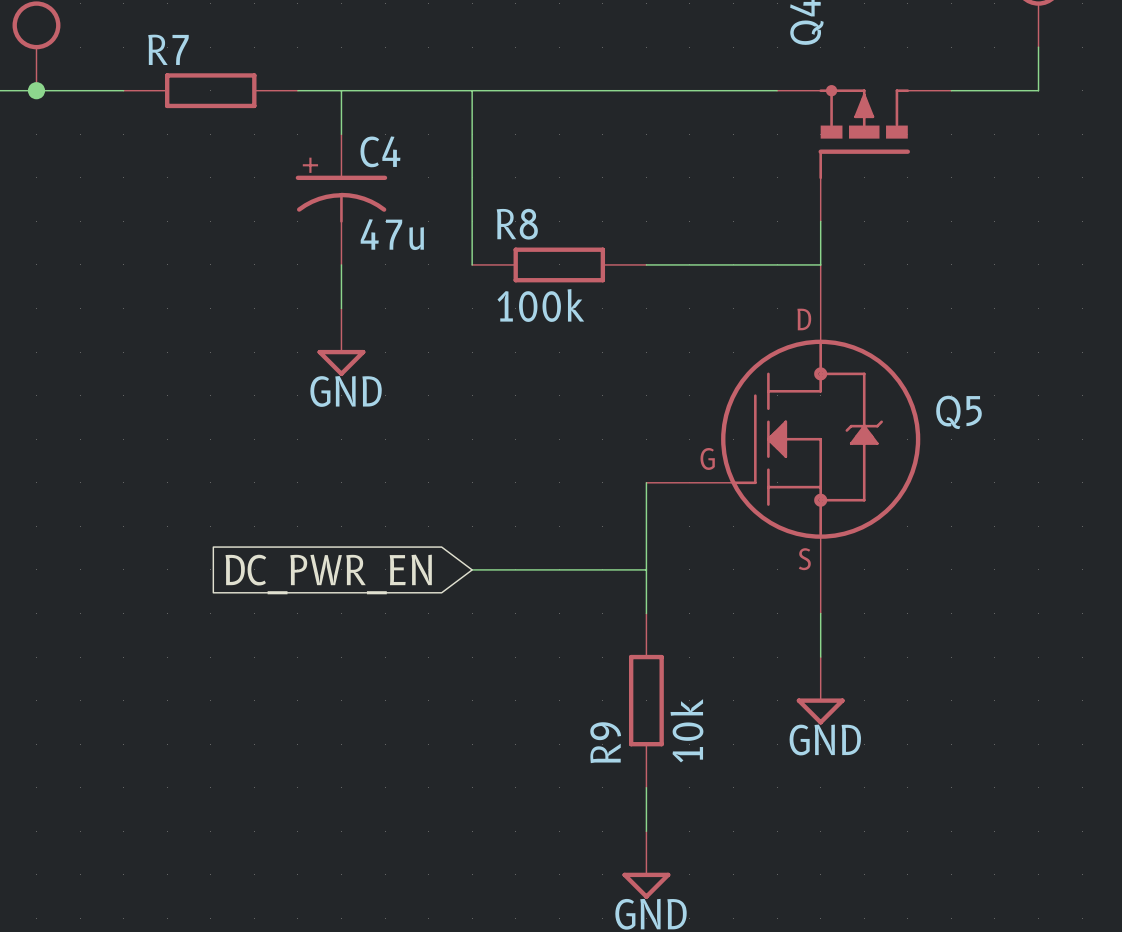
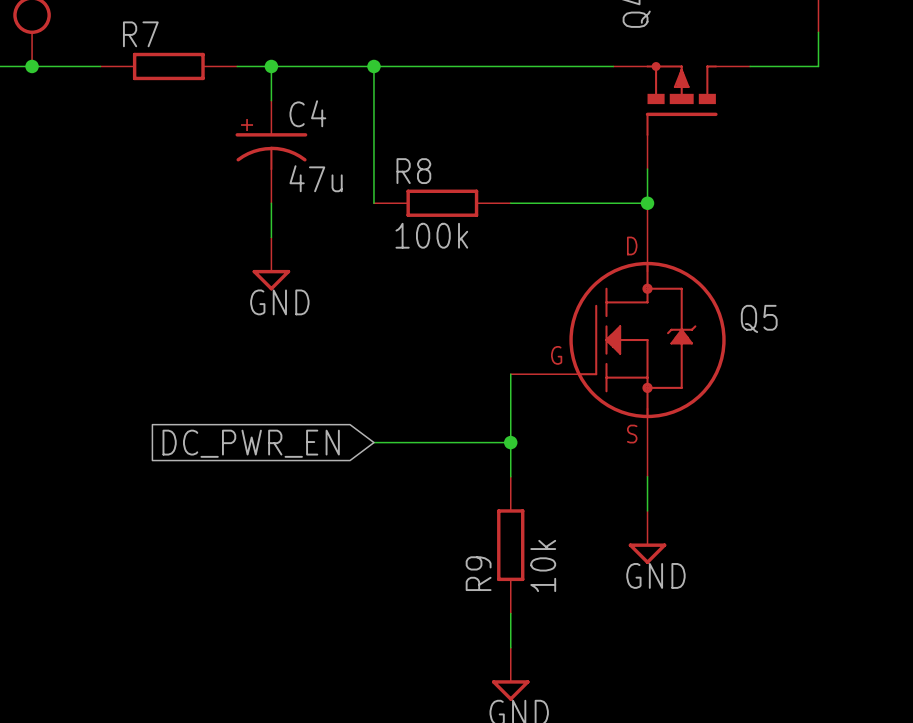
junction: none -> (271, 66)
junction: none -> (373, 66)
junction: none -> (647, 203)
junction: none -> (510, 442)

